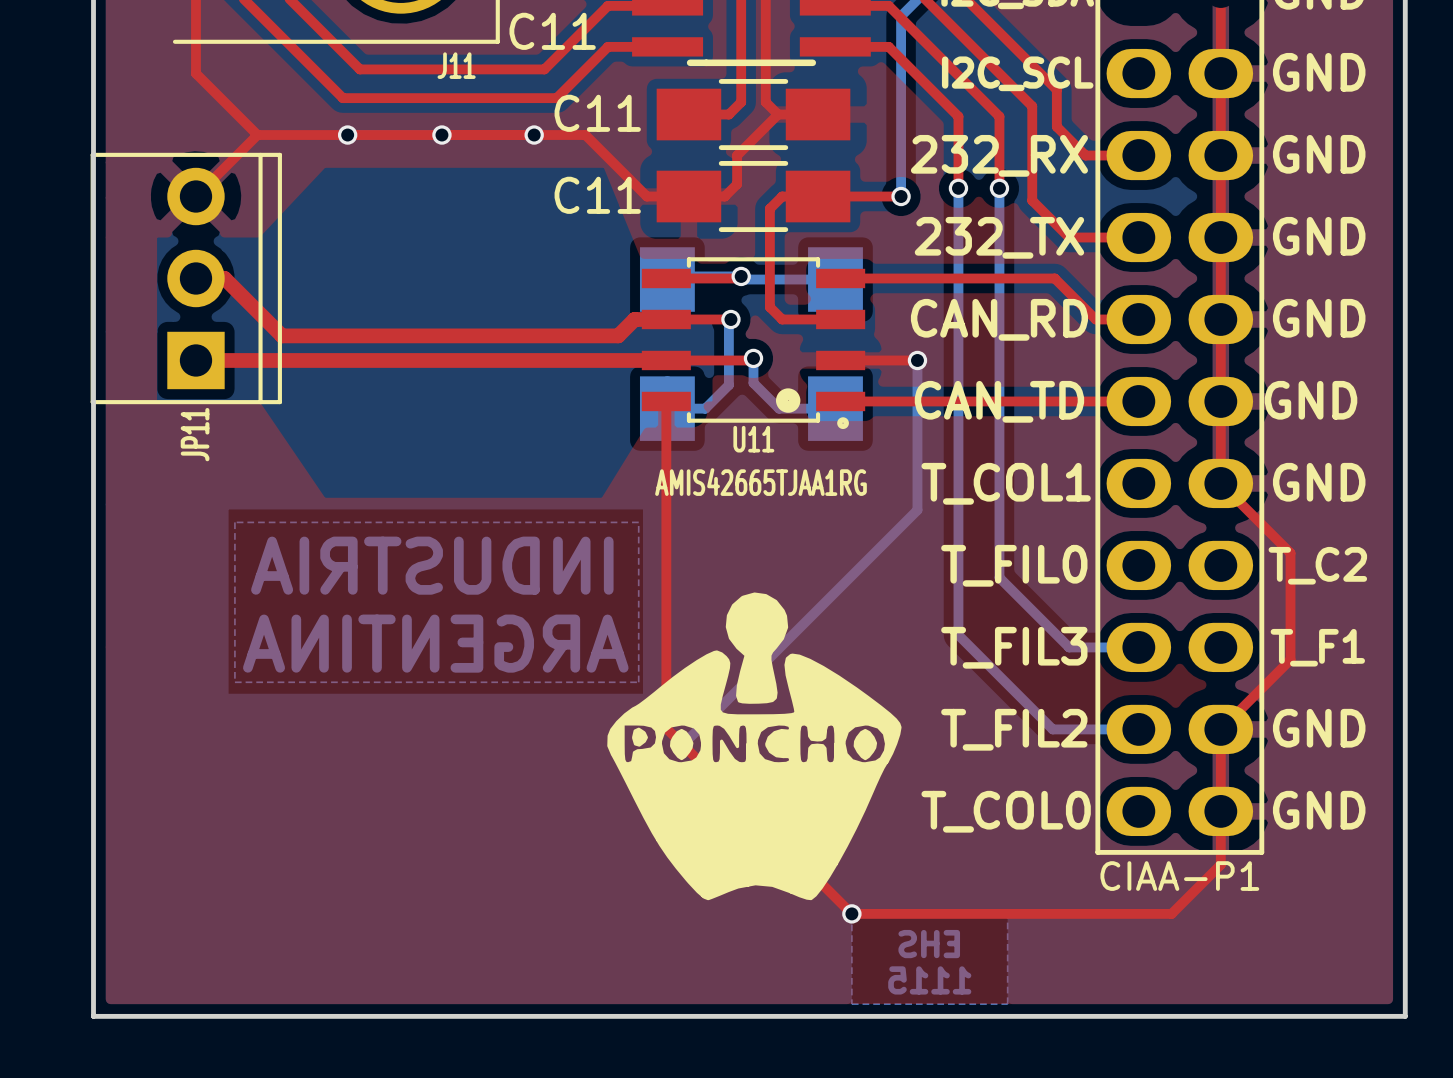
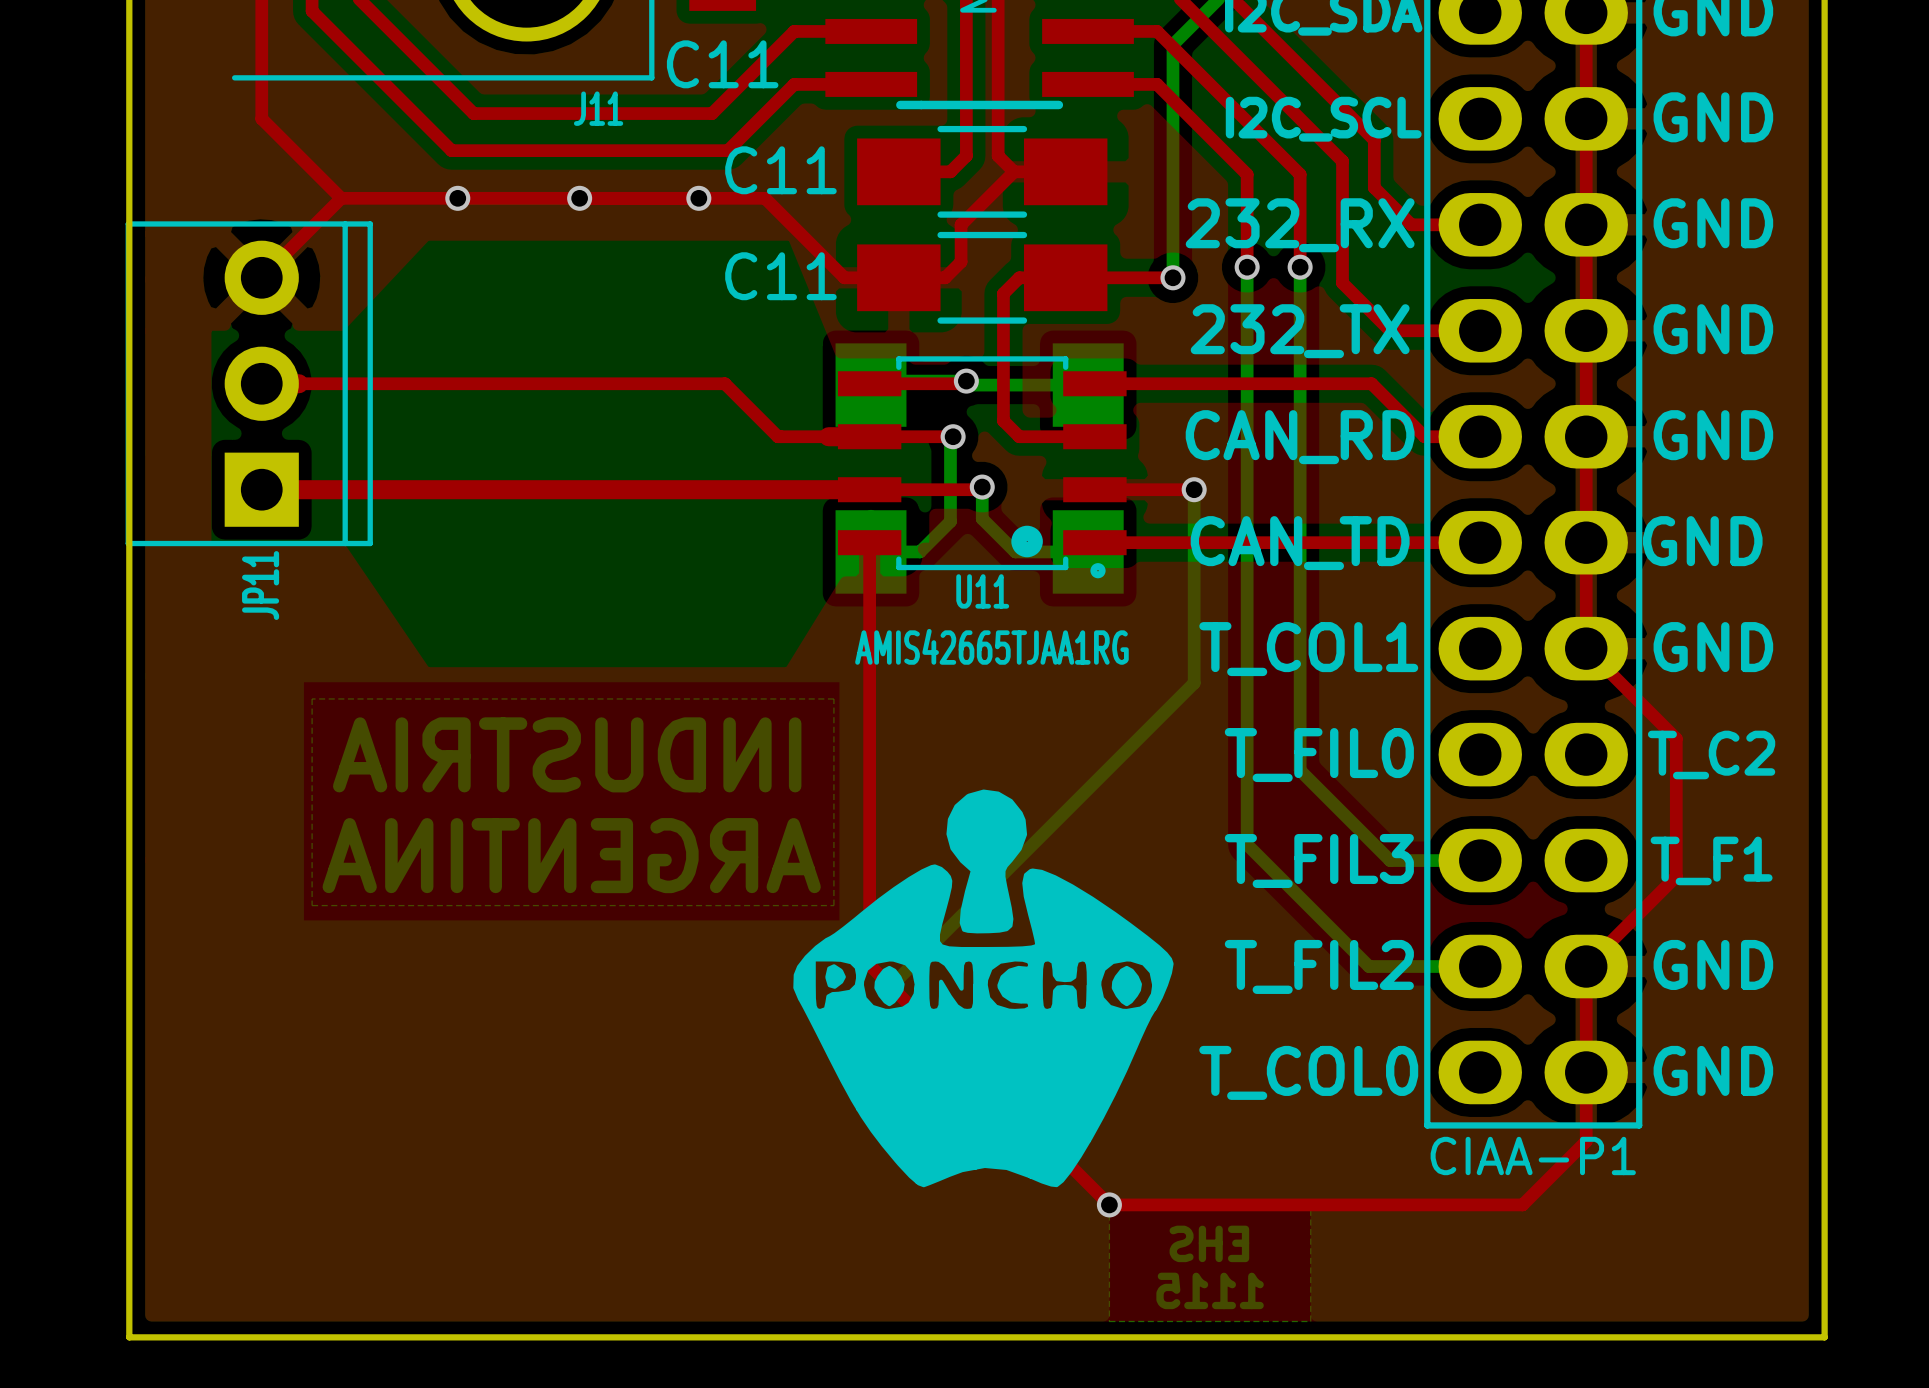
top track: (224, 278) (282, 335) (618, 335) (634, 319) -> (298, 383) (724, 383) (777, 436) (828, 436)

